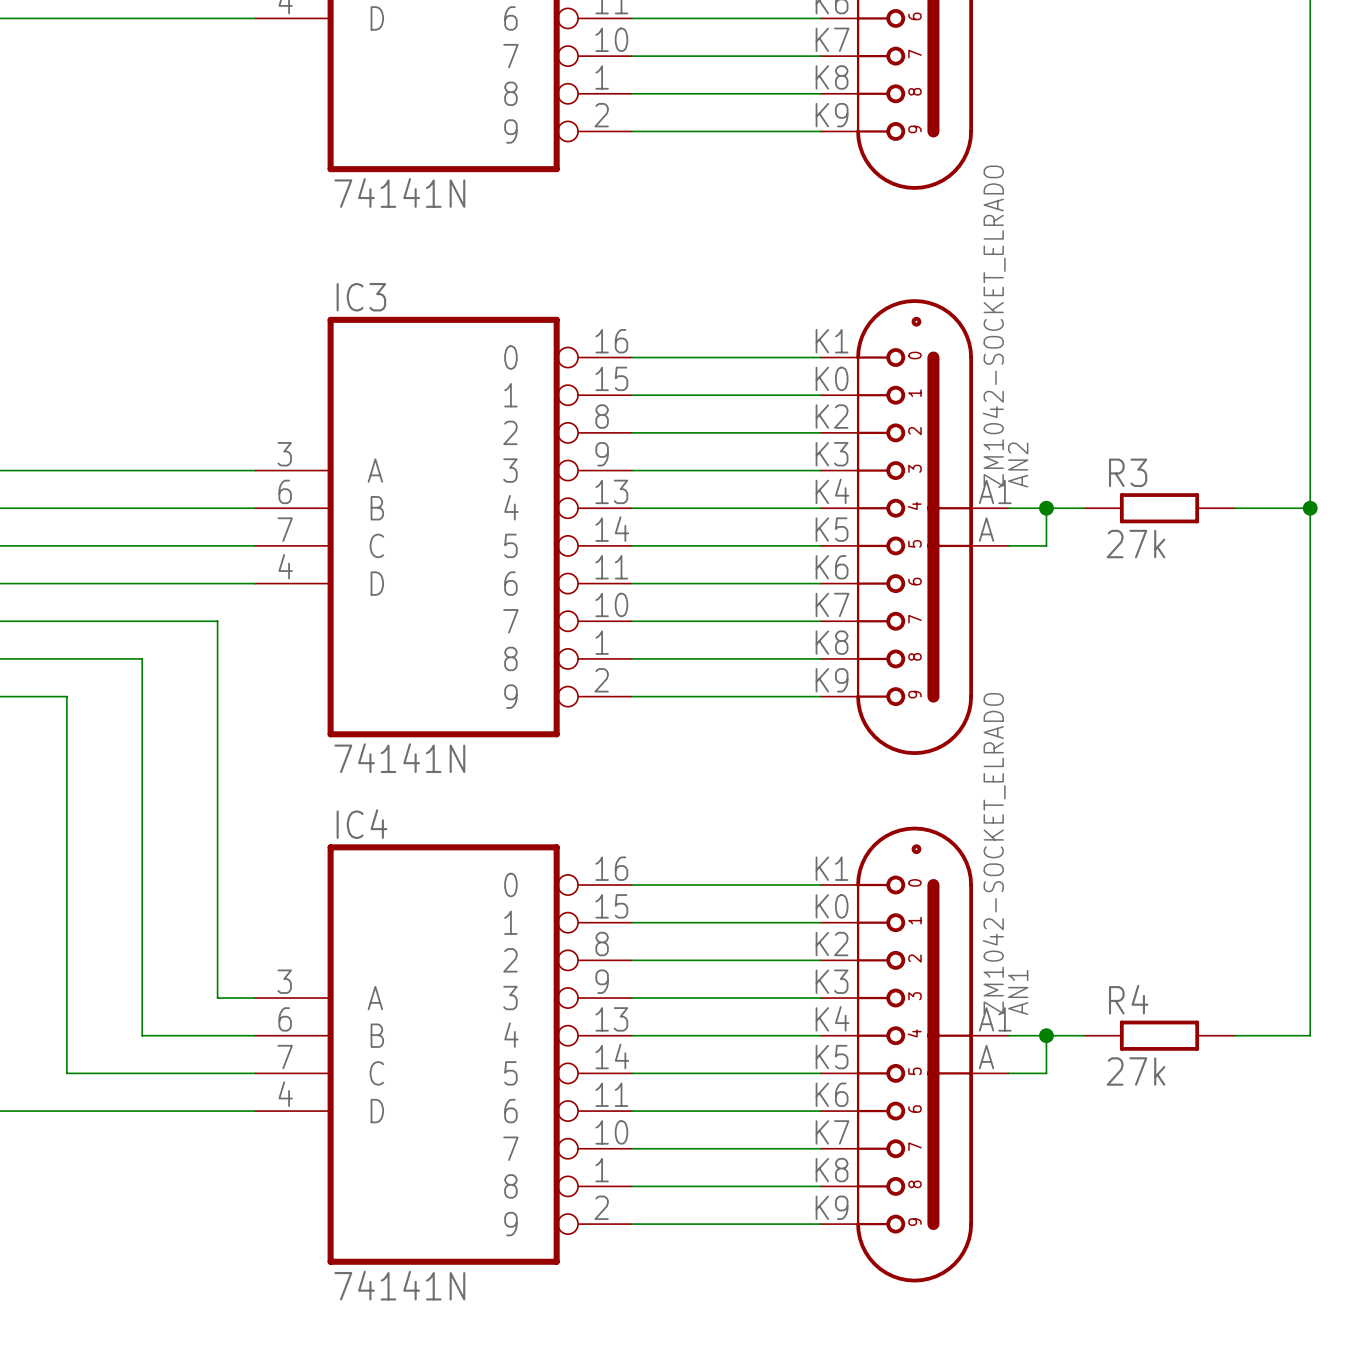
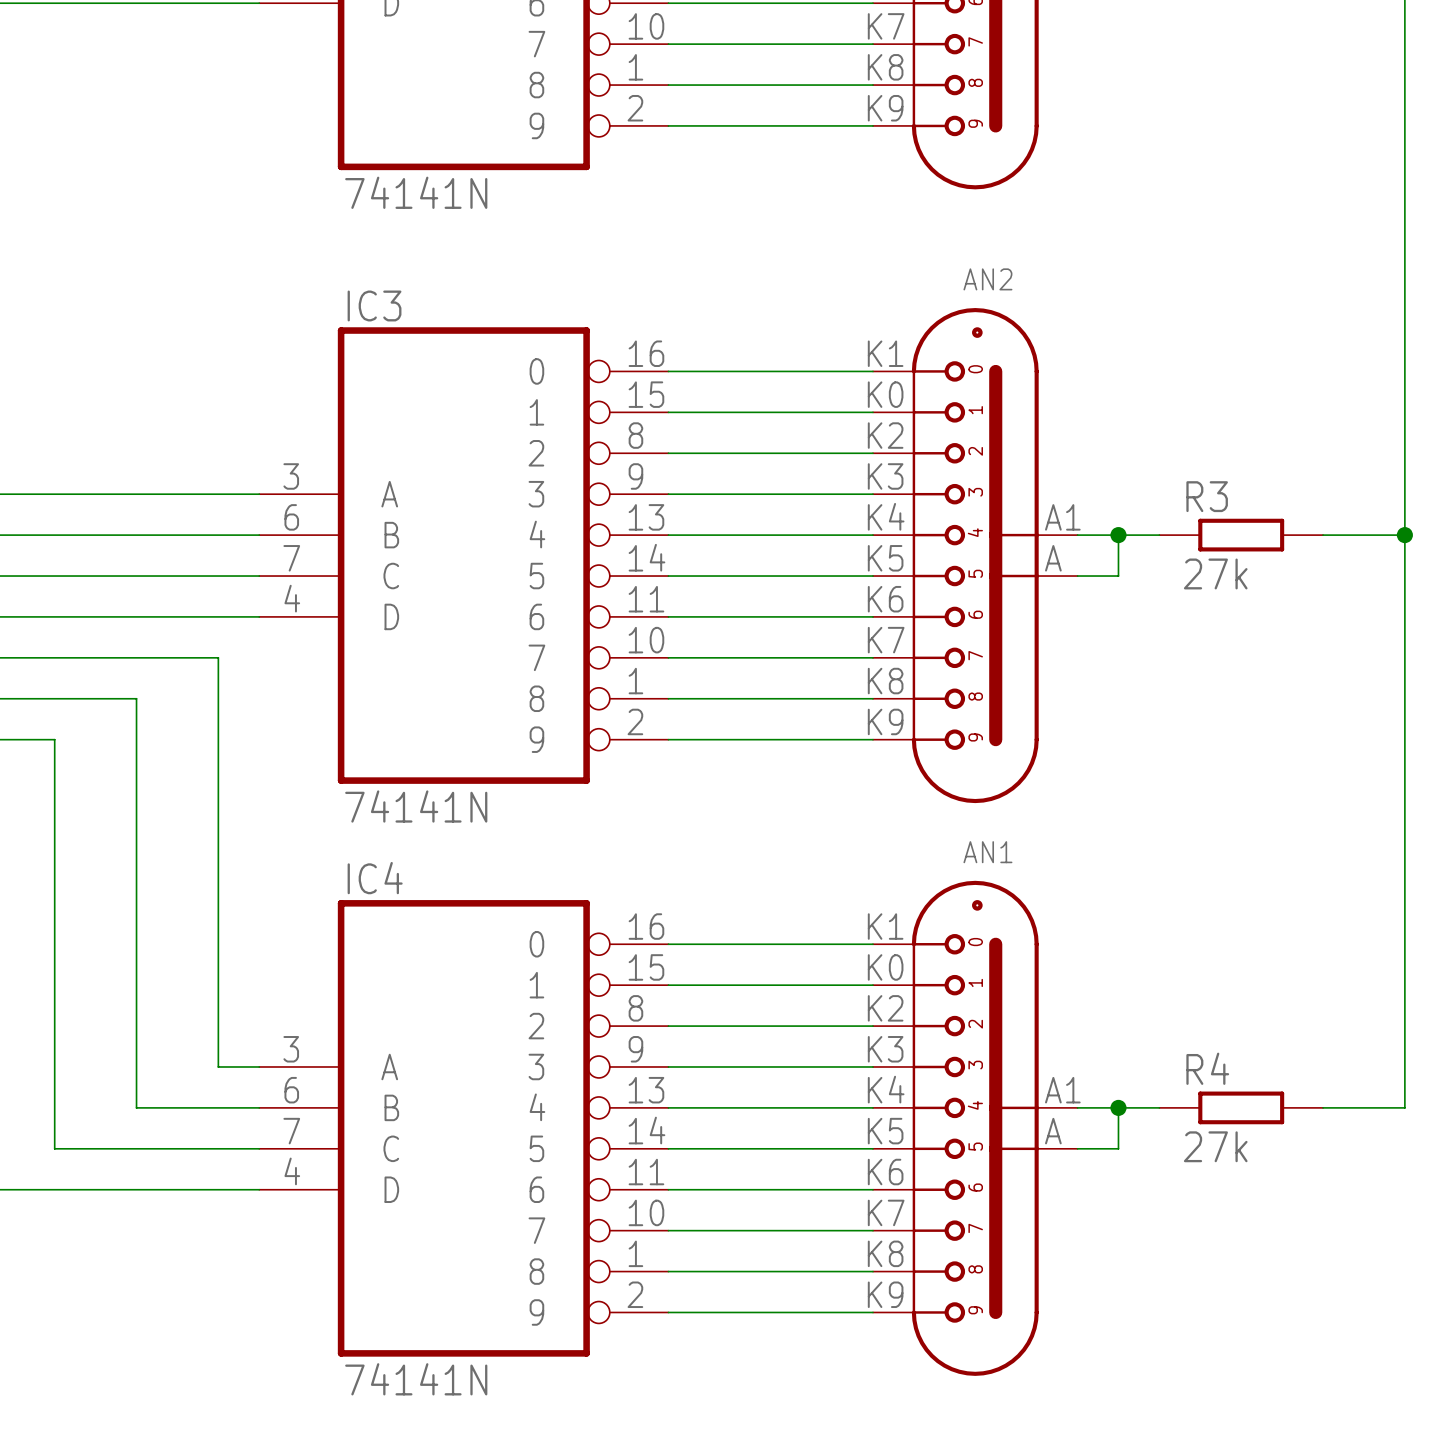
AN2 value: ZM1042-SOCKET_ELRADO (994, 326) -> none
AN2 name rotation: 0° (1018, 464) -> 90° clockwise (987, 279)
AN2 name position: AN2 (1018, 464) -> AN2 (987, 279)
AN1 value: ZM1042-SOCKET_ELRADO (994, 853) -> none
AN1 name rotation: 0° (1018, 992) -> 90° clockwise (987, 852)
AN1 name position: AN1 (1018, 992) -> AN1 (987, 852)

